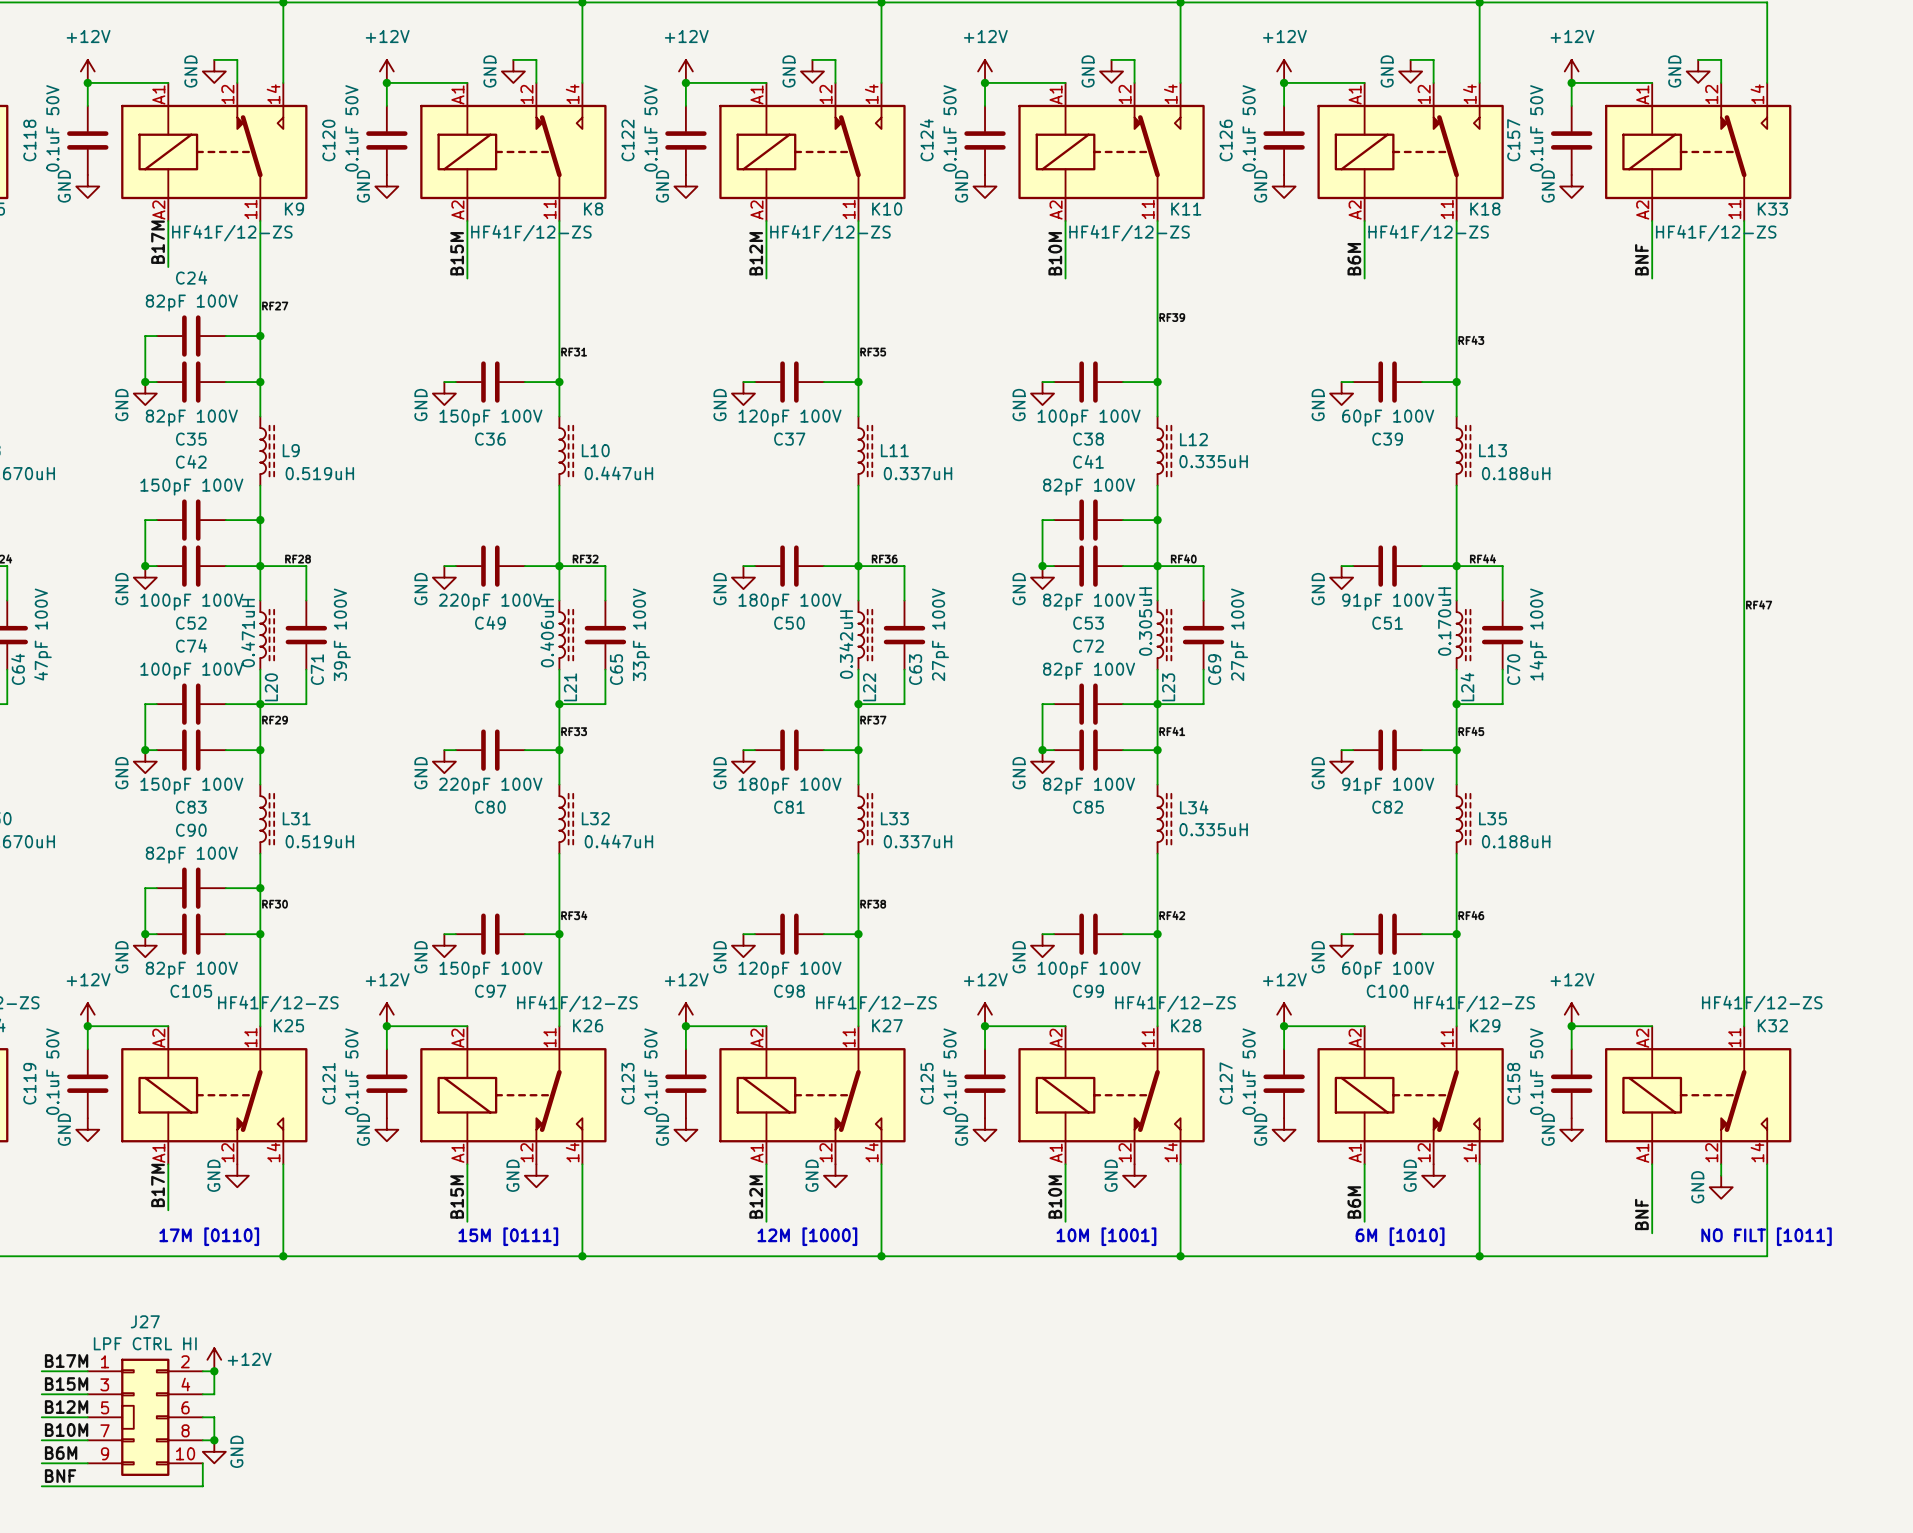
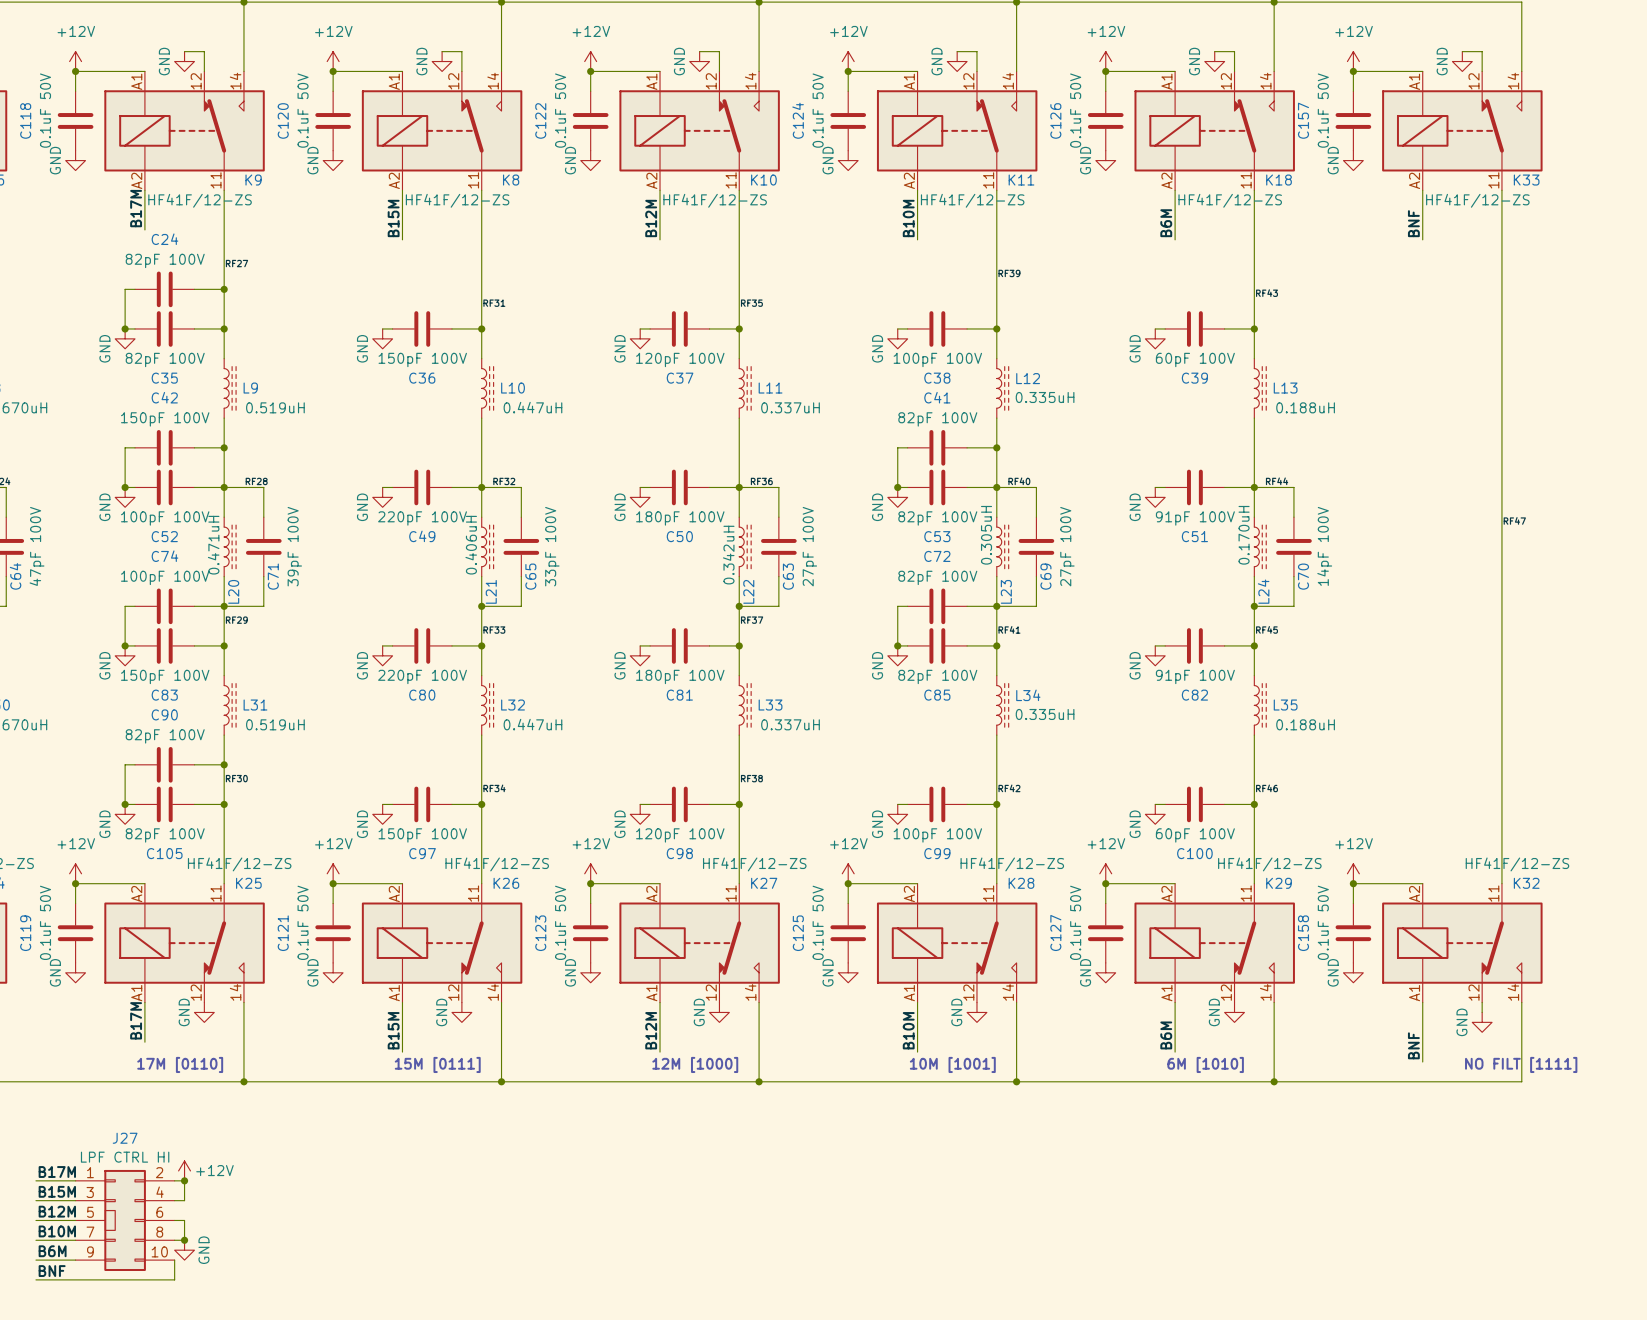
text: NO FILT [1011] (1766, 1236) -> NO FILT [1111] (1521, 1064)

